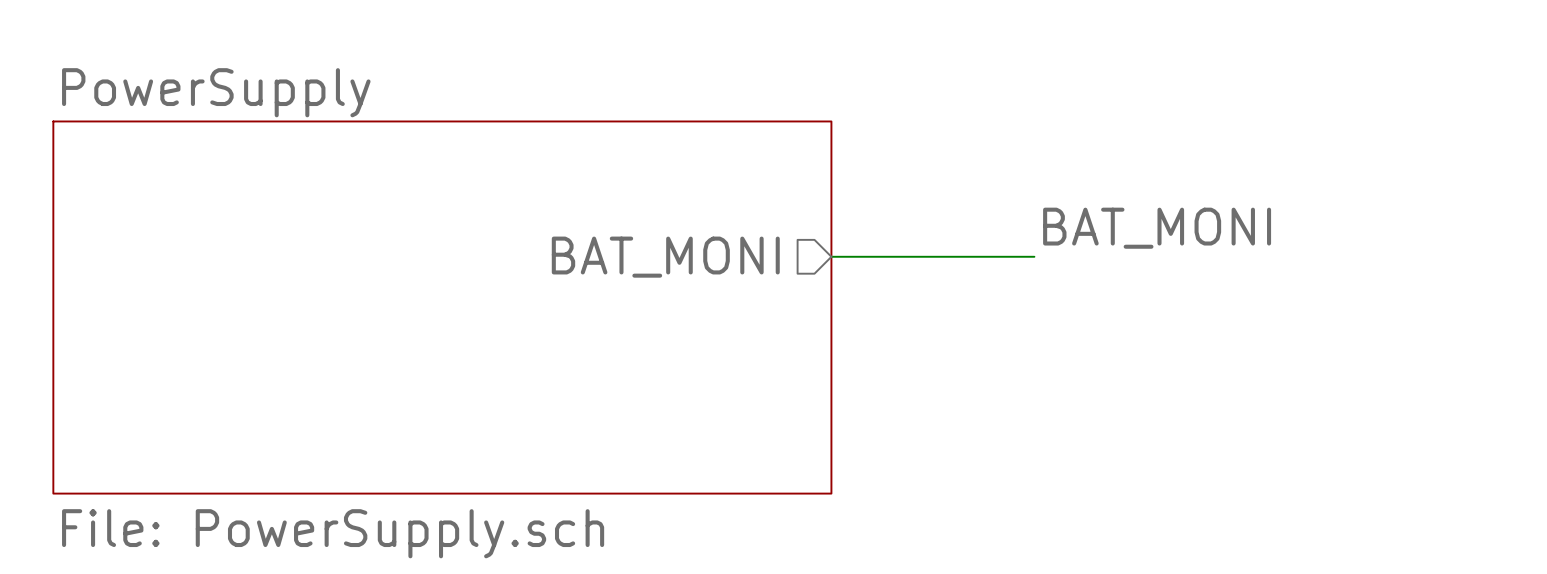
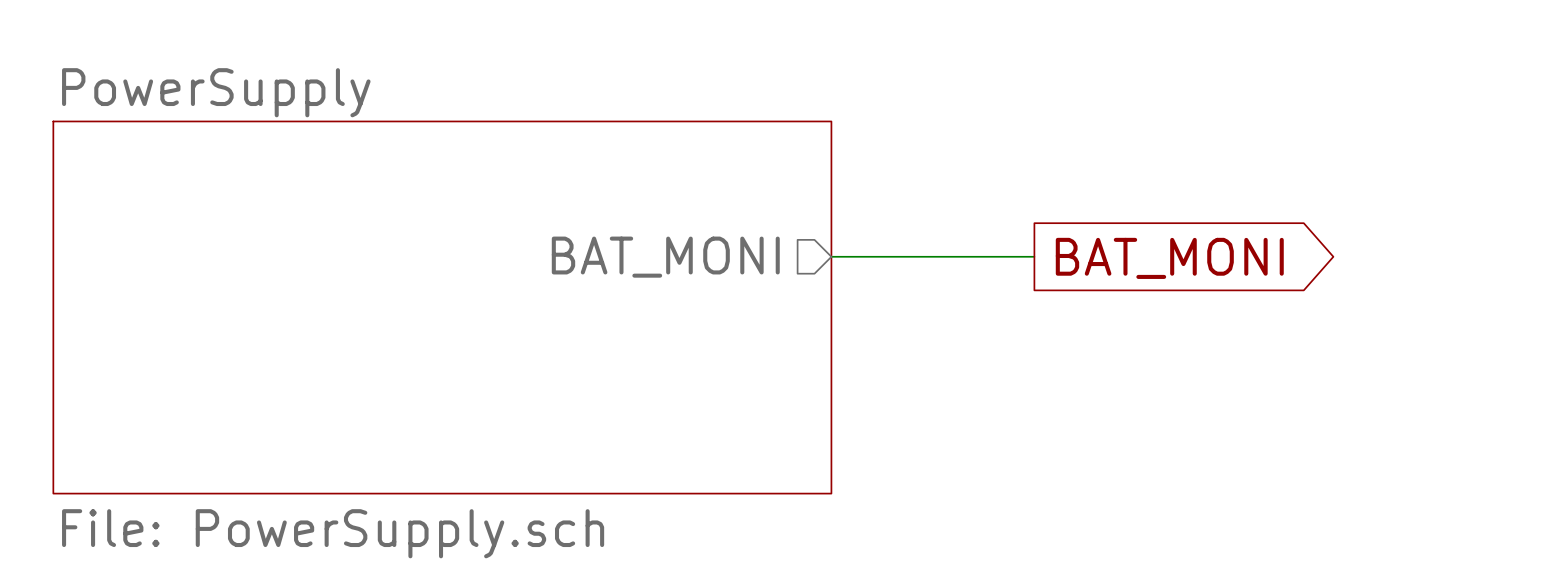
label: BAT_MONI (1157, 228) -> none
global label: none -> BAT_MONI (1169, 258)

